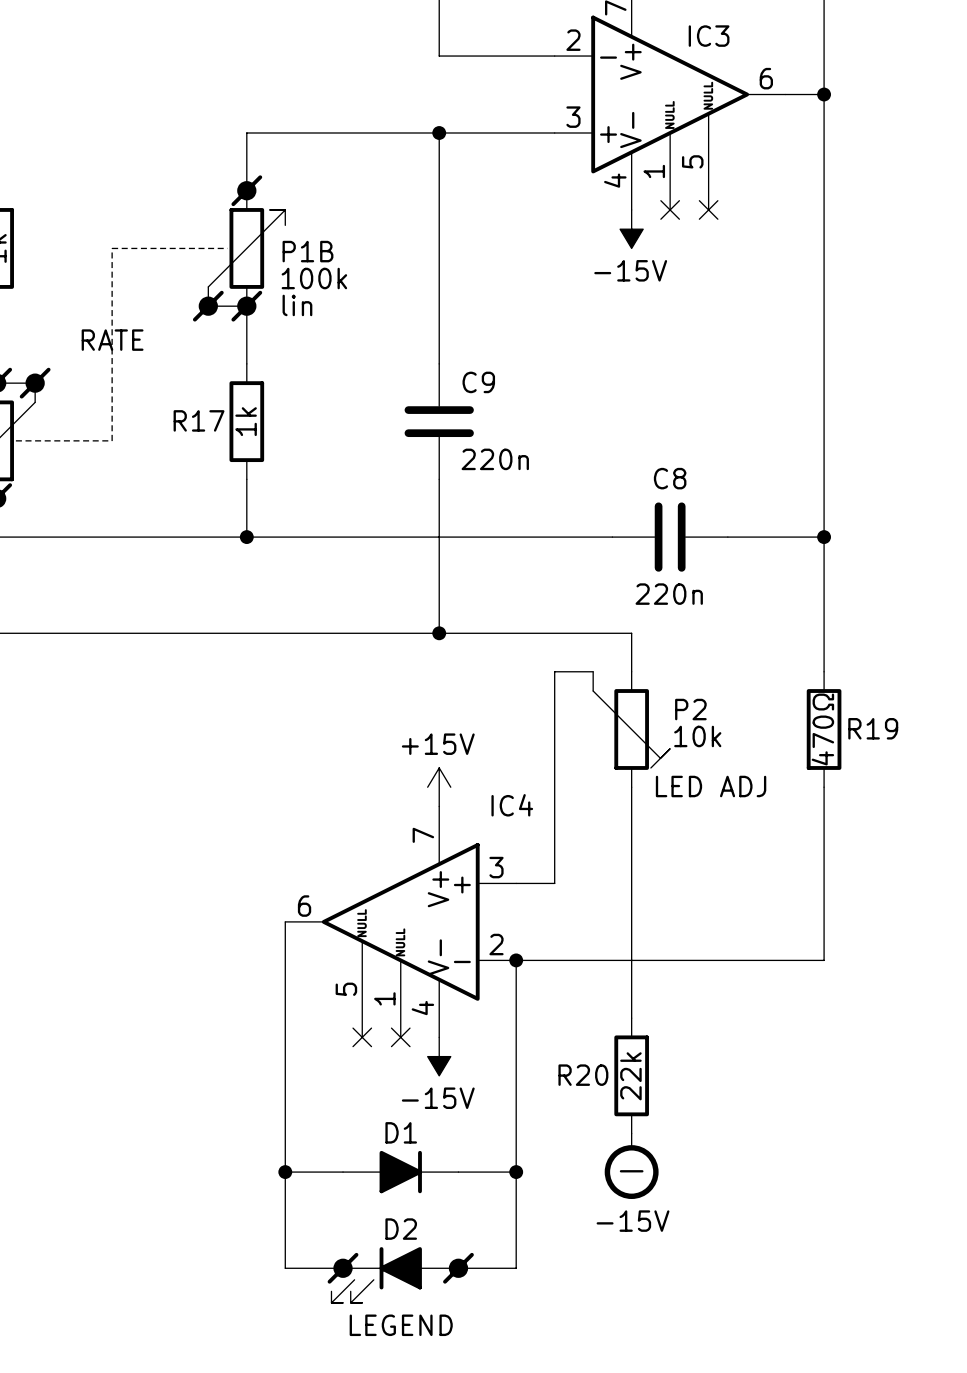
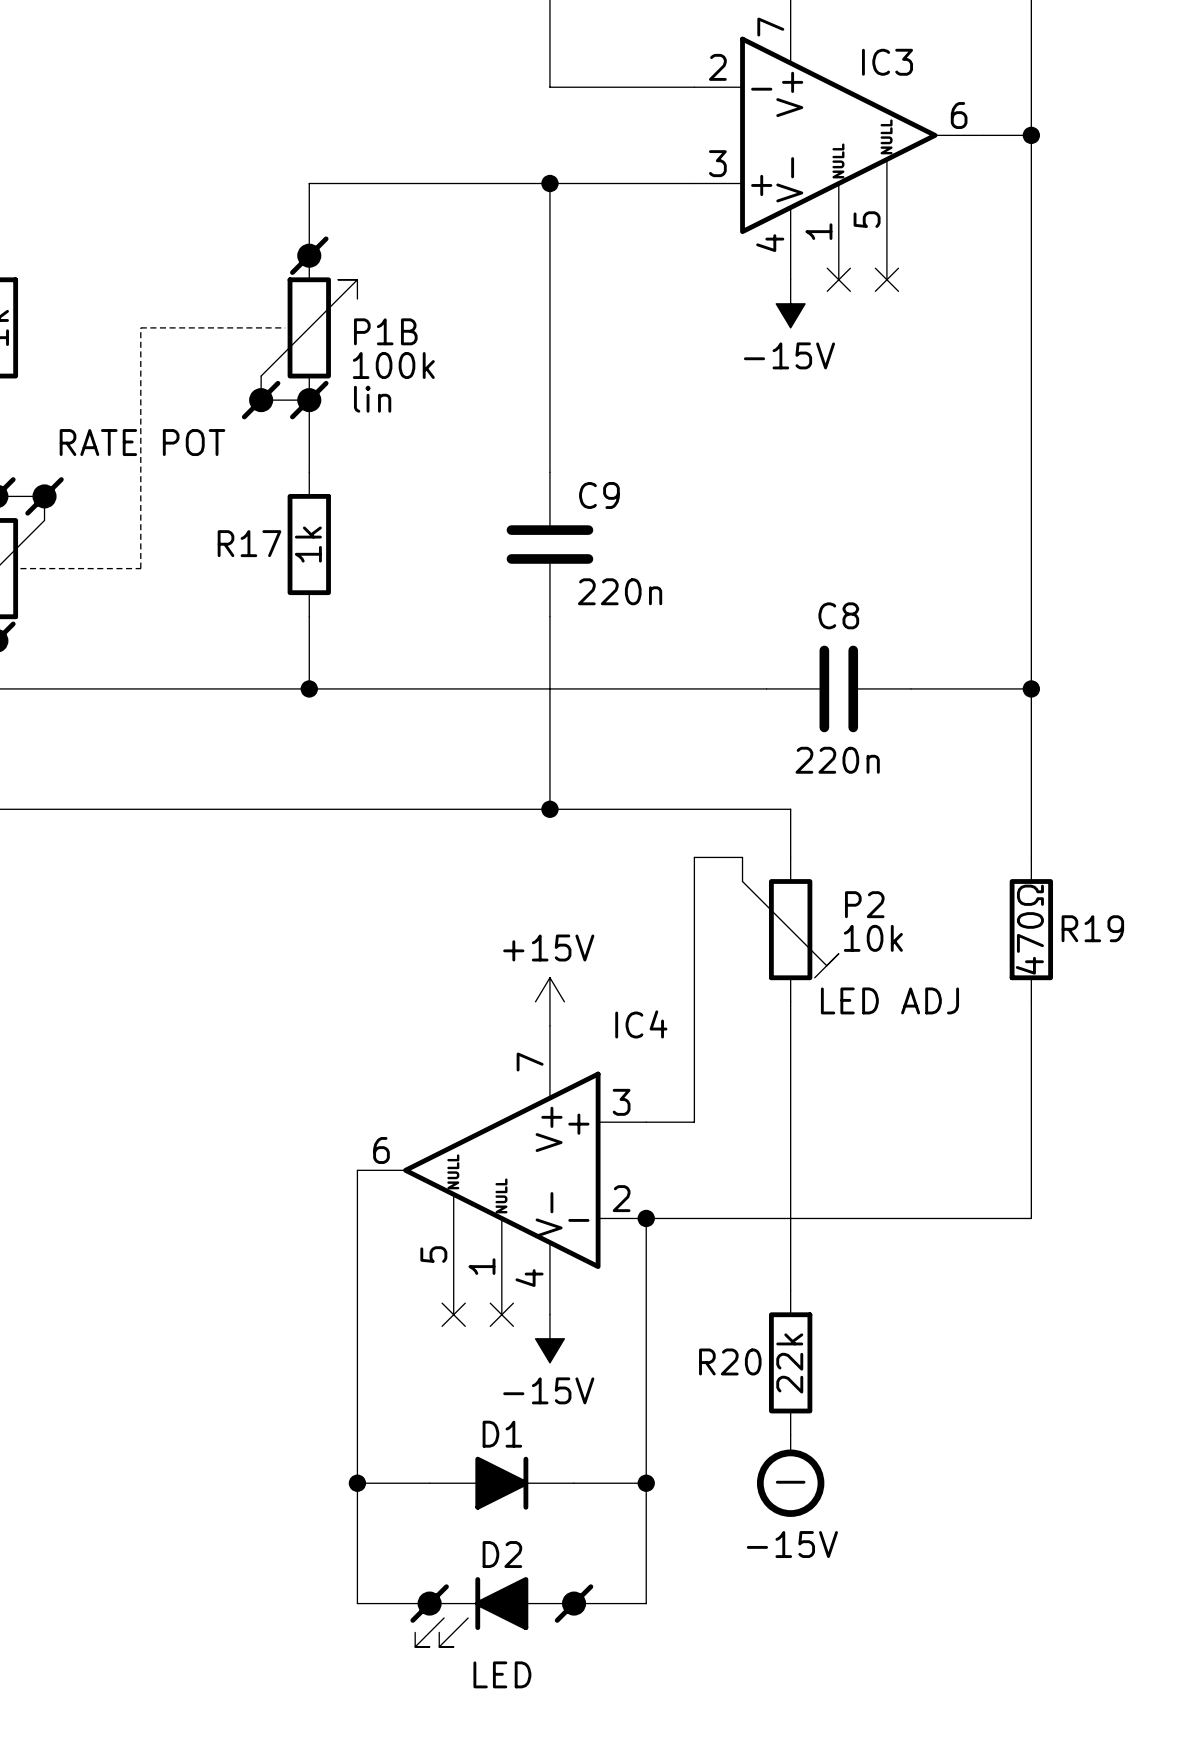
P1B text: RATE (112, 340) -> RATE POT (142, 442)
D2 text: LEGEND (401, 1325) -> LED (502, 1674)

